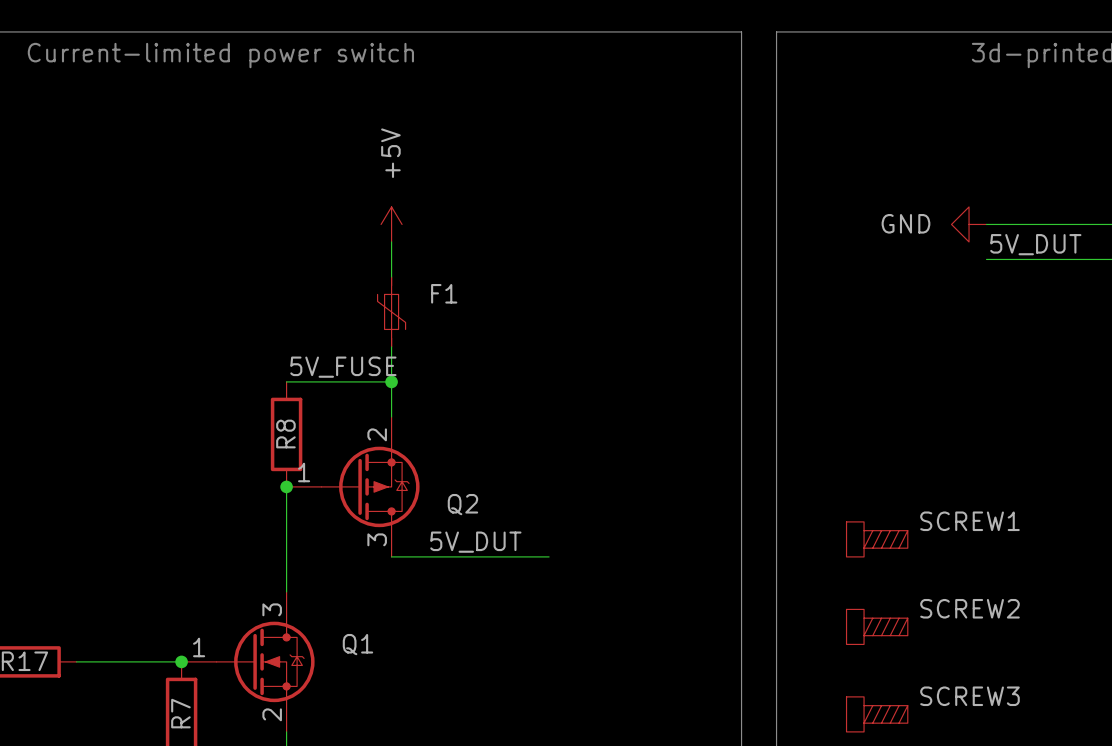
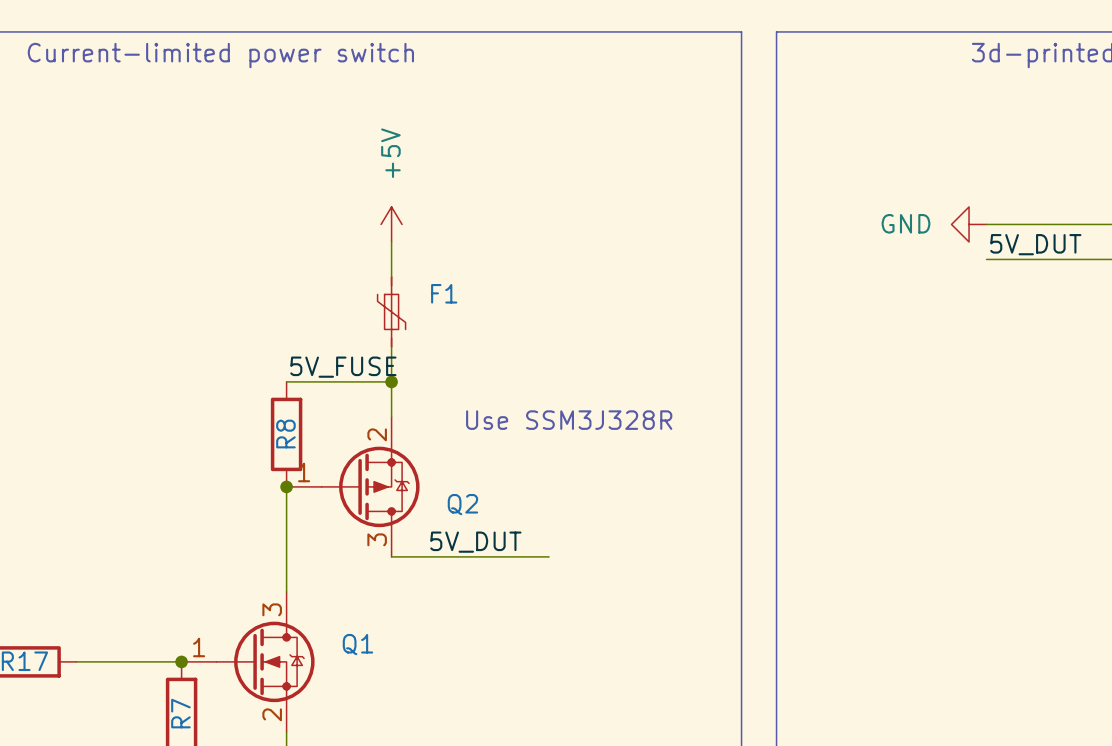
text: none -> Use SSM3J328R (569, 420)
SCREW1: (877, 539) -> none
SCREW2: (877, 626) -> none
SCREW3: (877, 714) -> none

